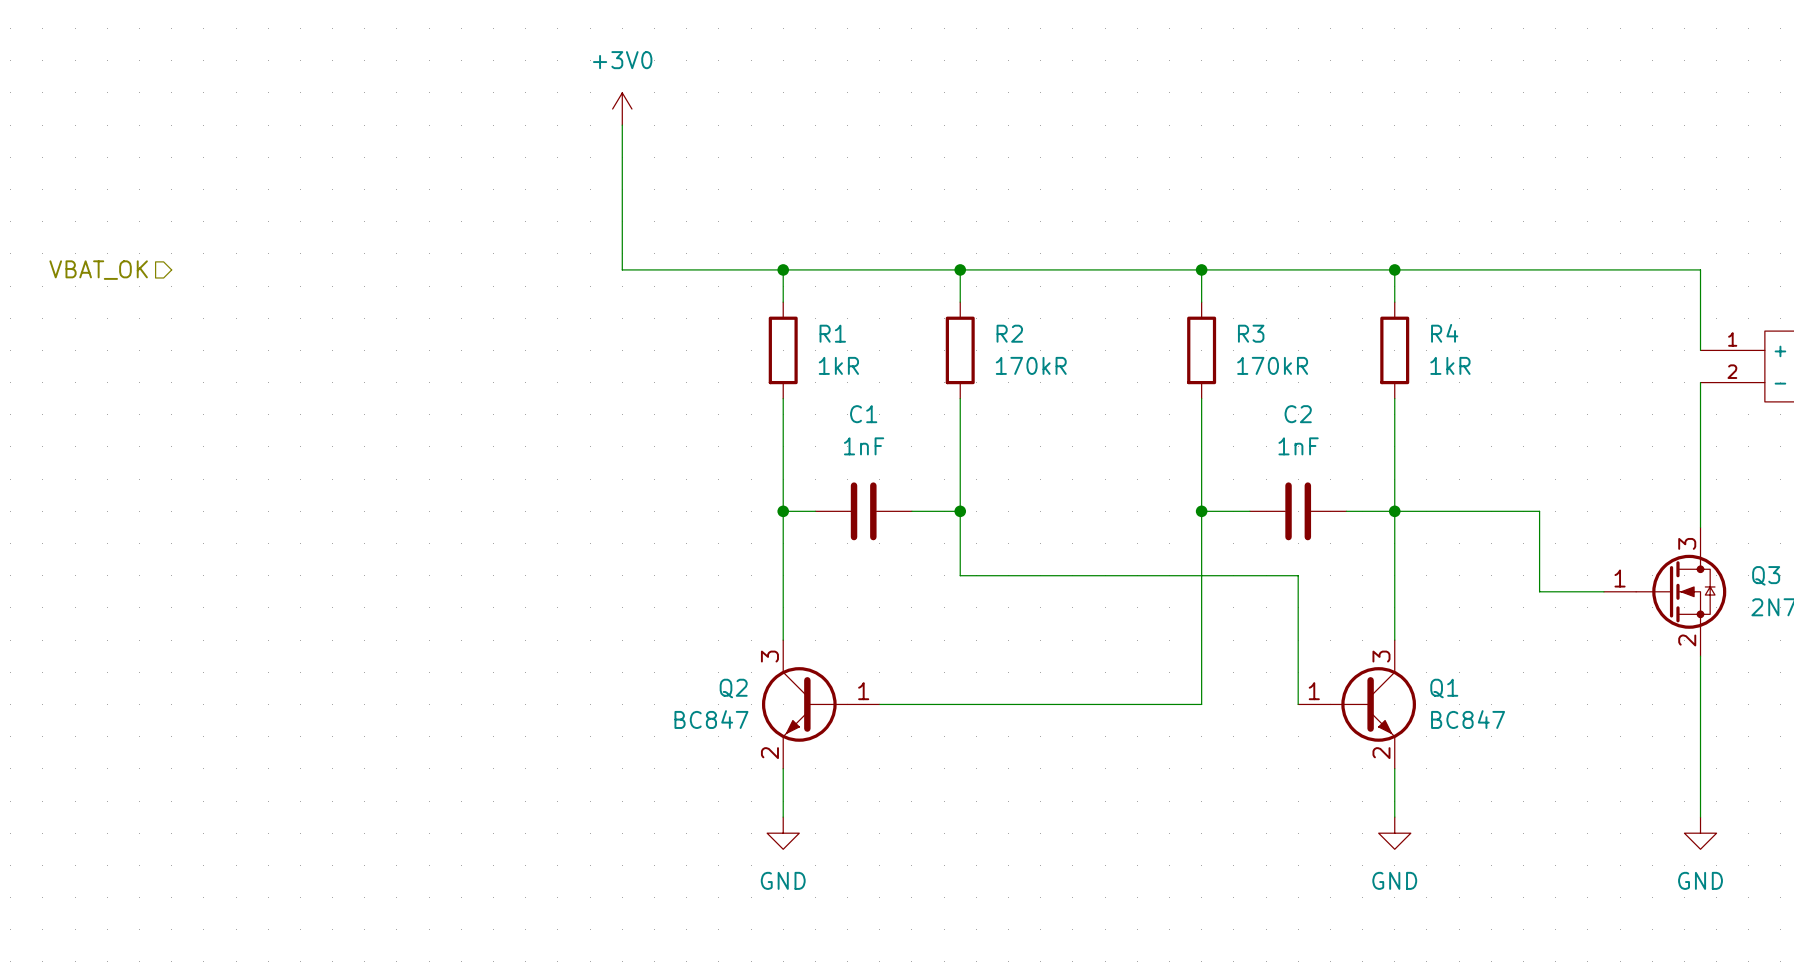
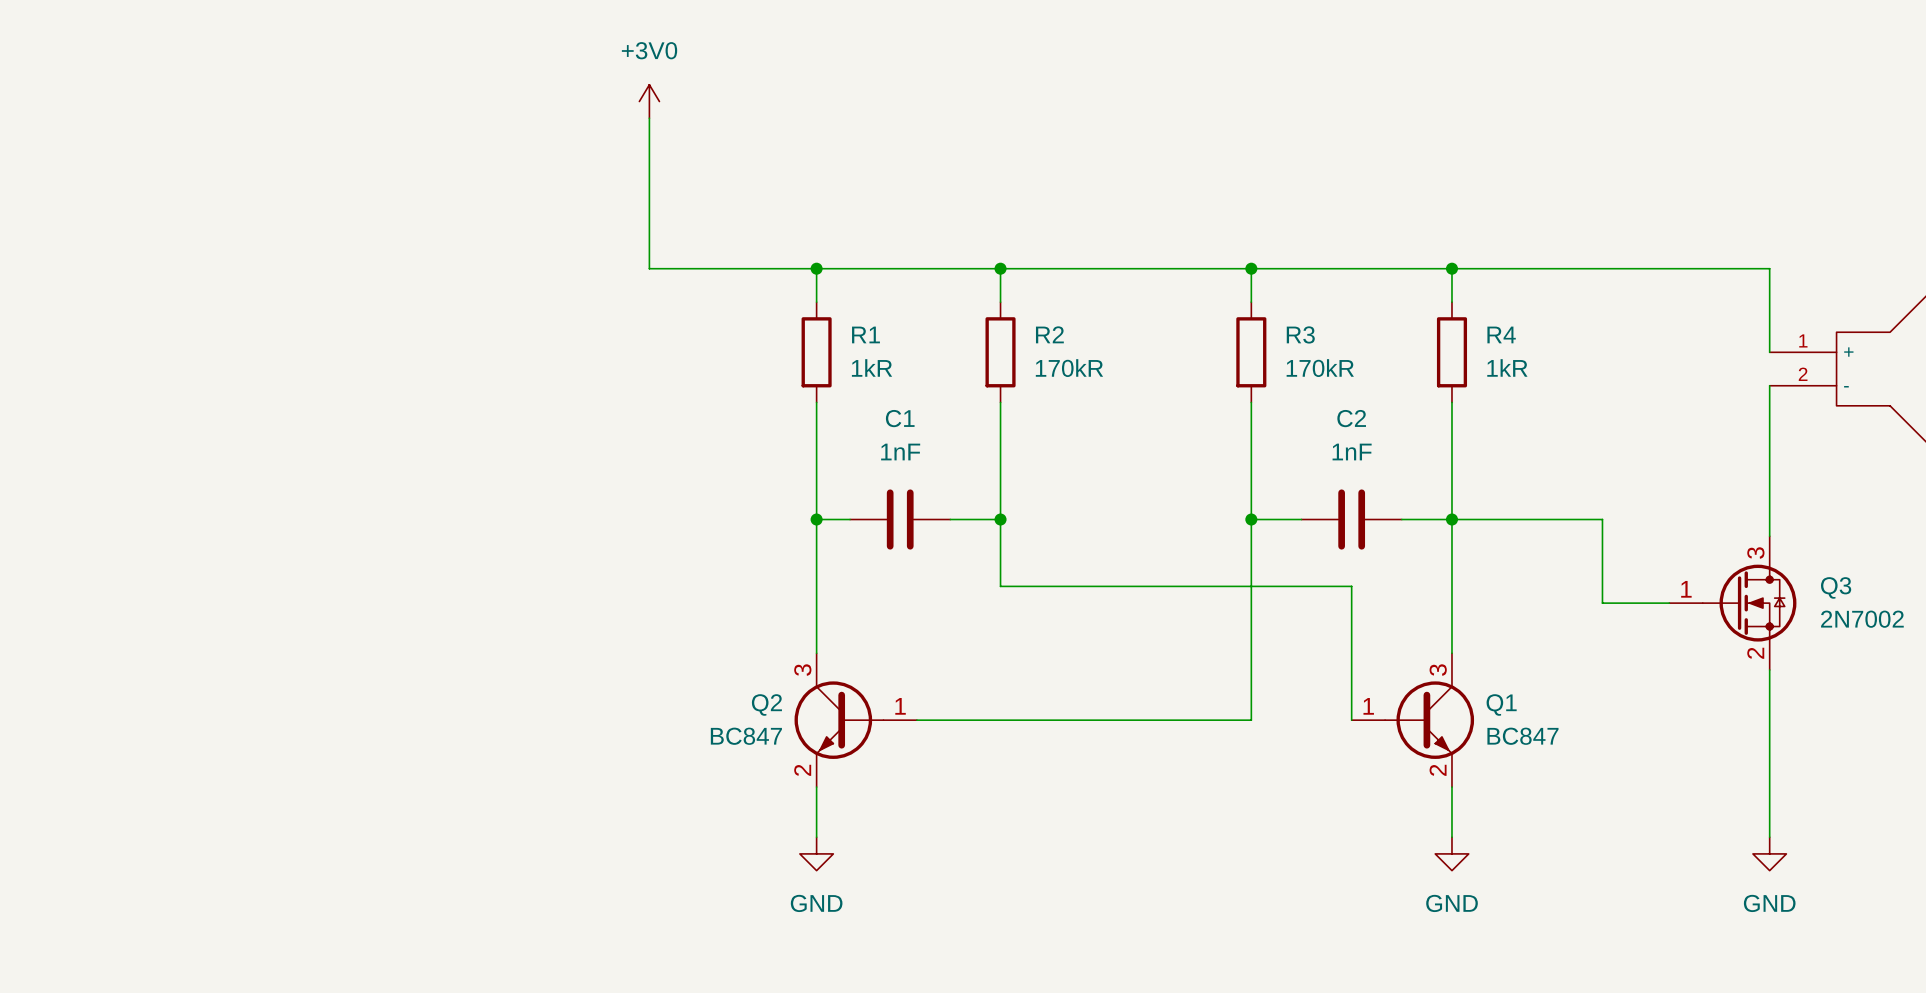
hierarchical label: VBAT_OK (98, 270) -> none

